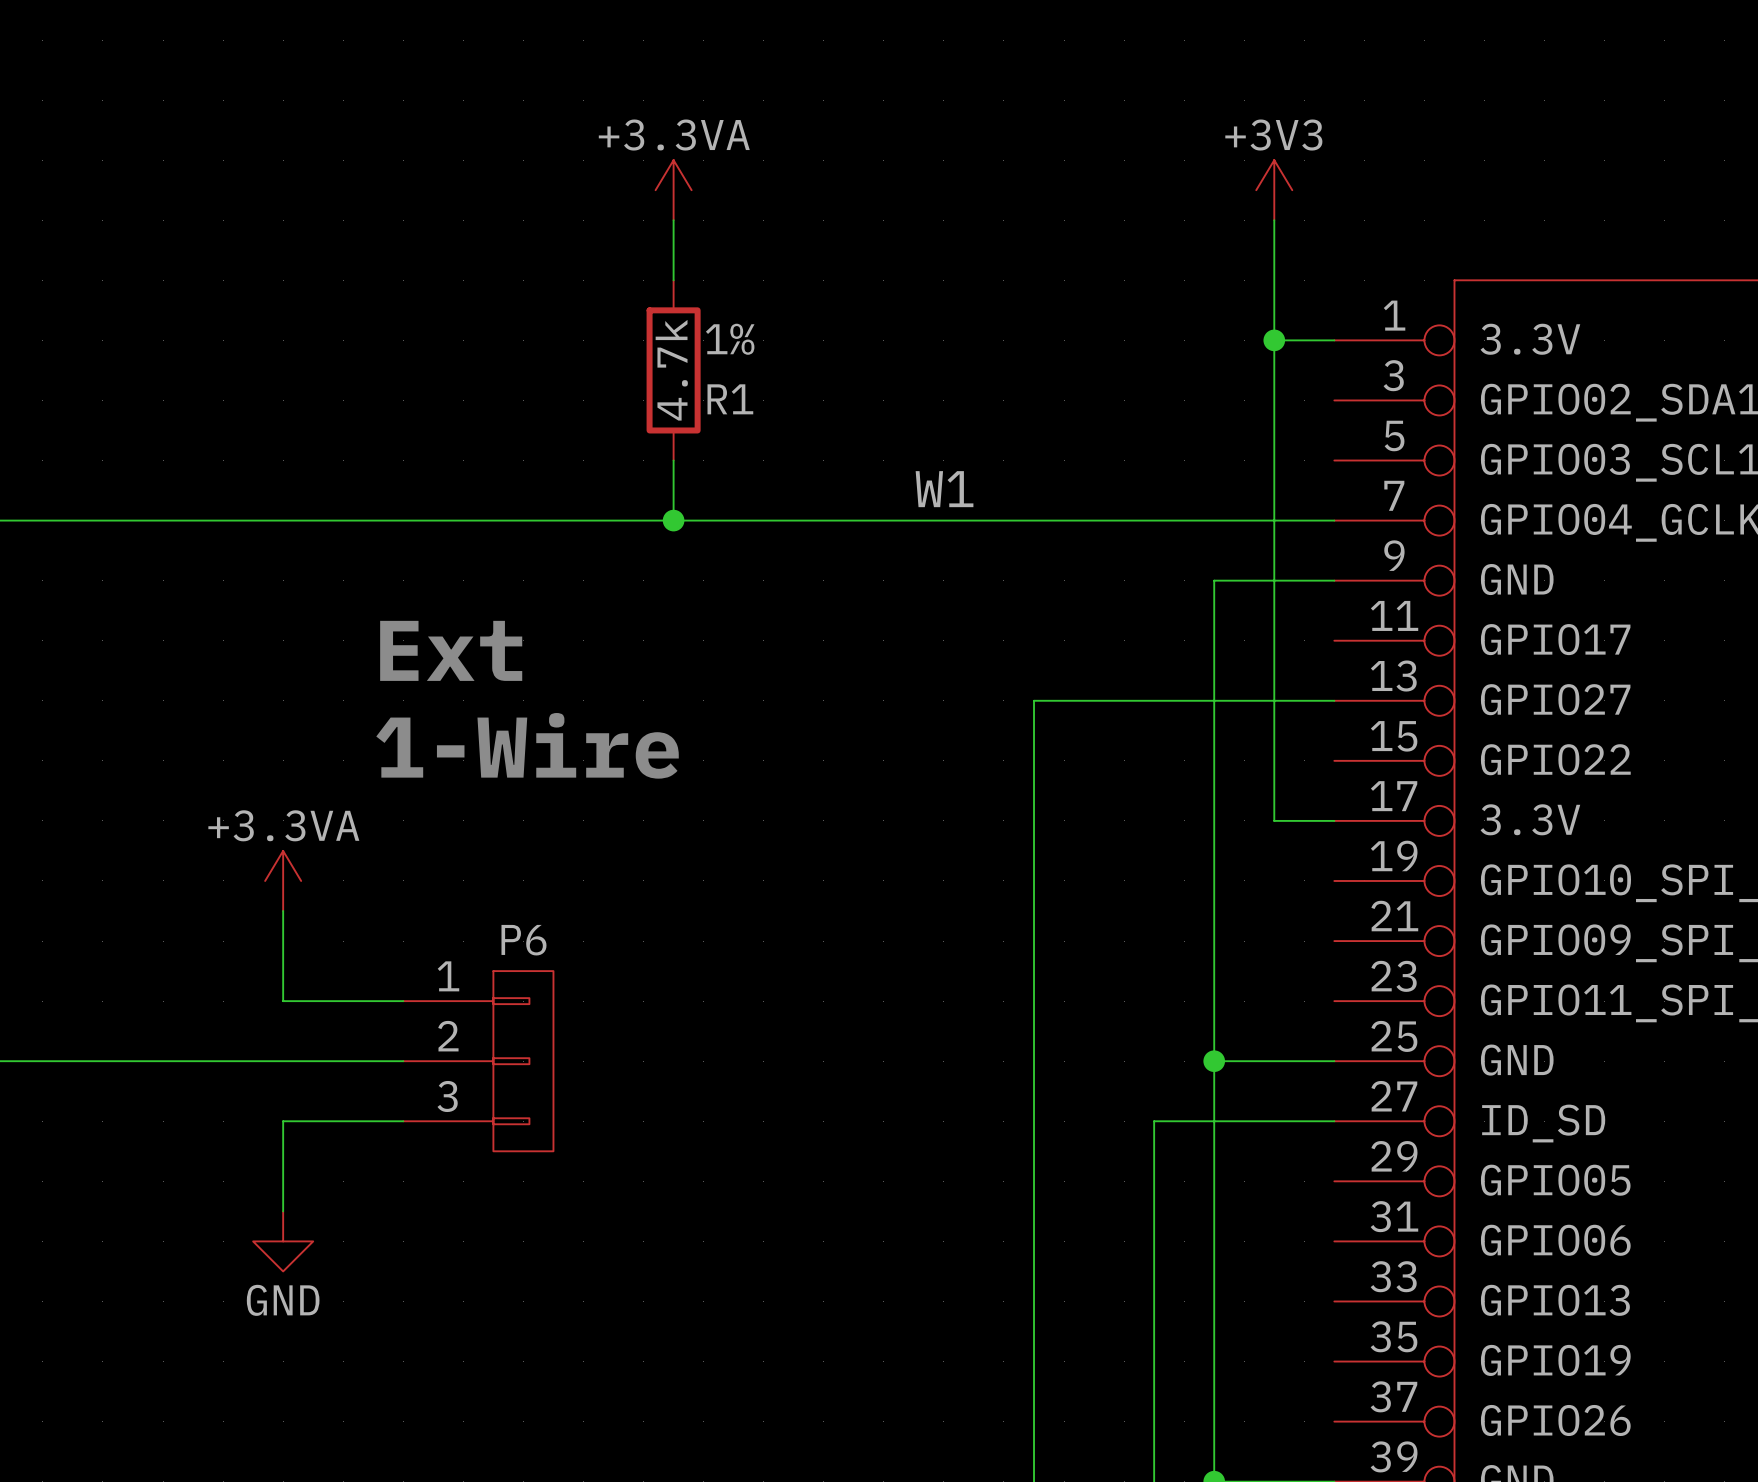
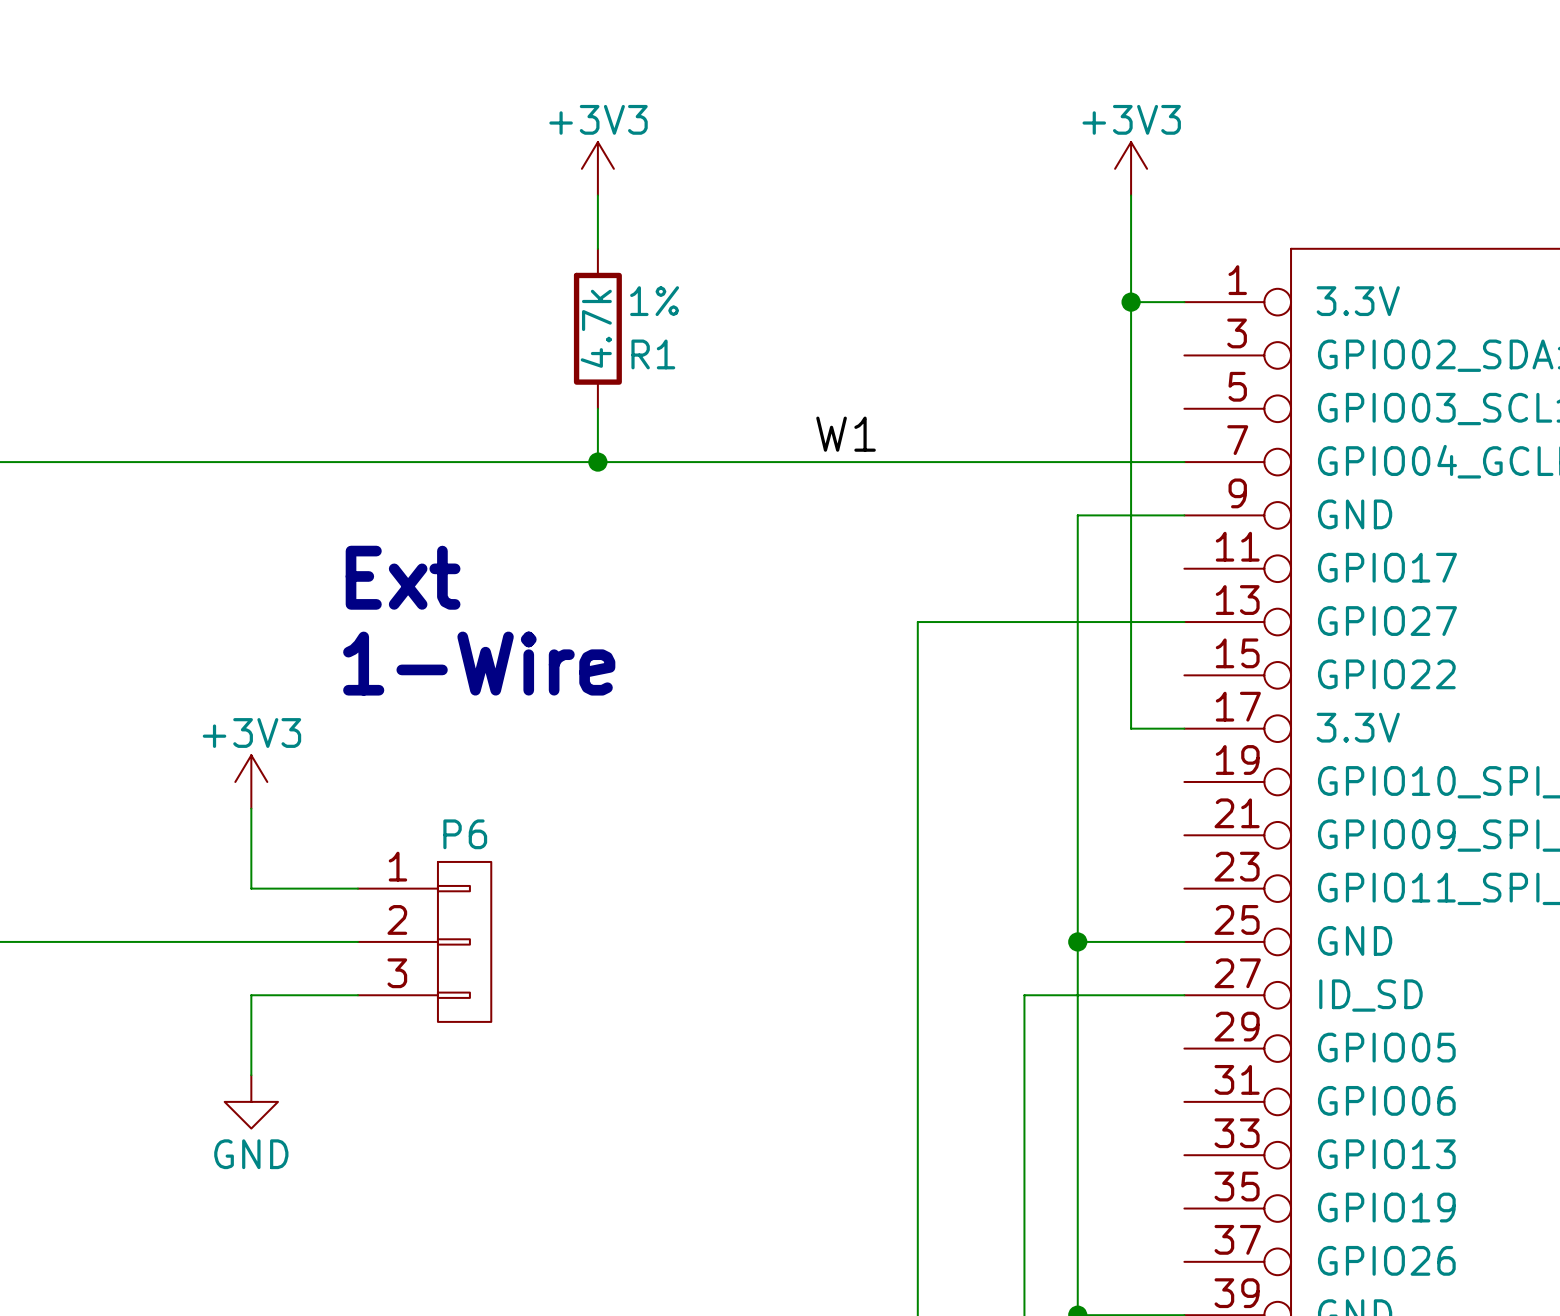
power symbol: +3.3VA (673, 190) -> +3V3 (597, 168)
power symbol: +3.3VA (283, 880) -> +3V3 (251, 781)

